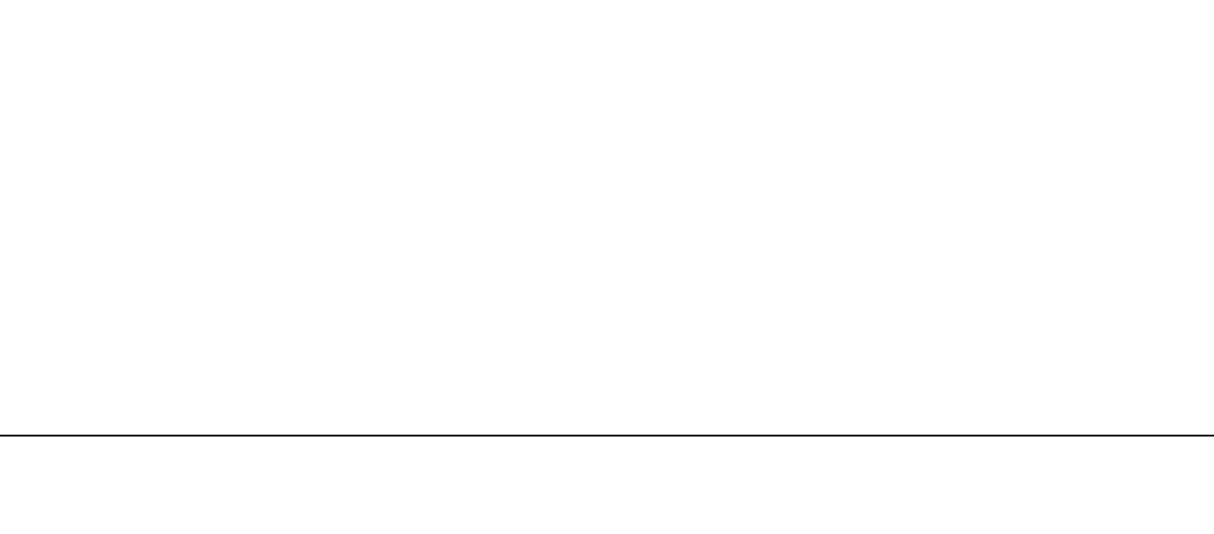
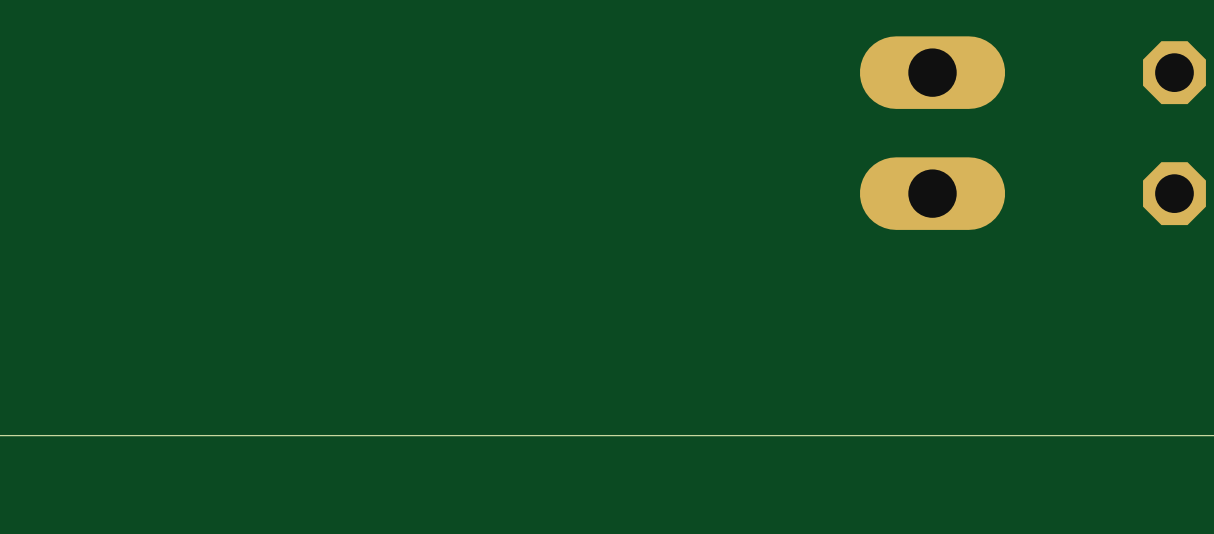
part: none -> (932, 133)
part: none -> (1174, 133)

